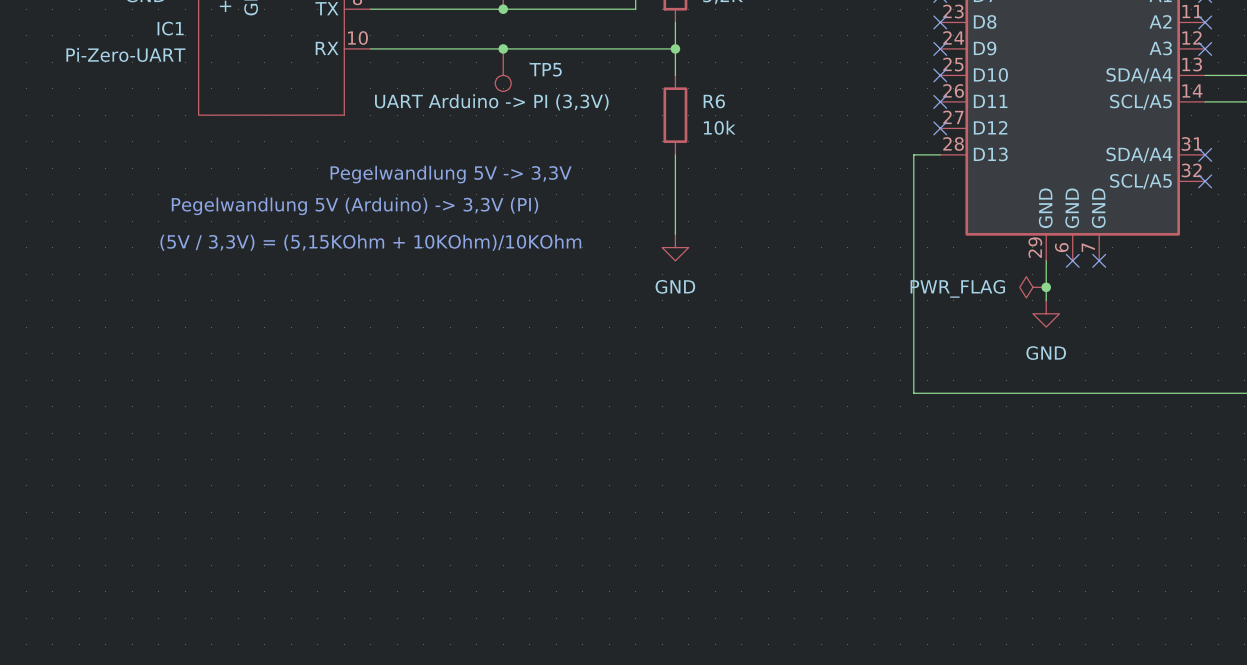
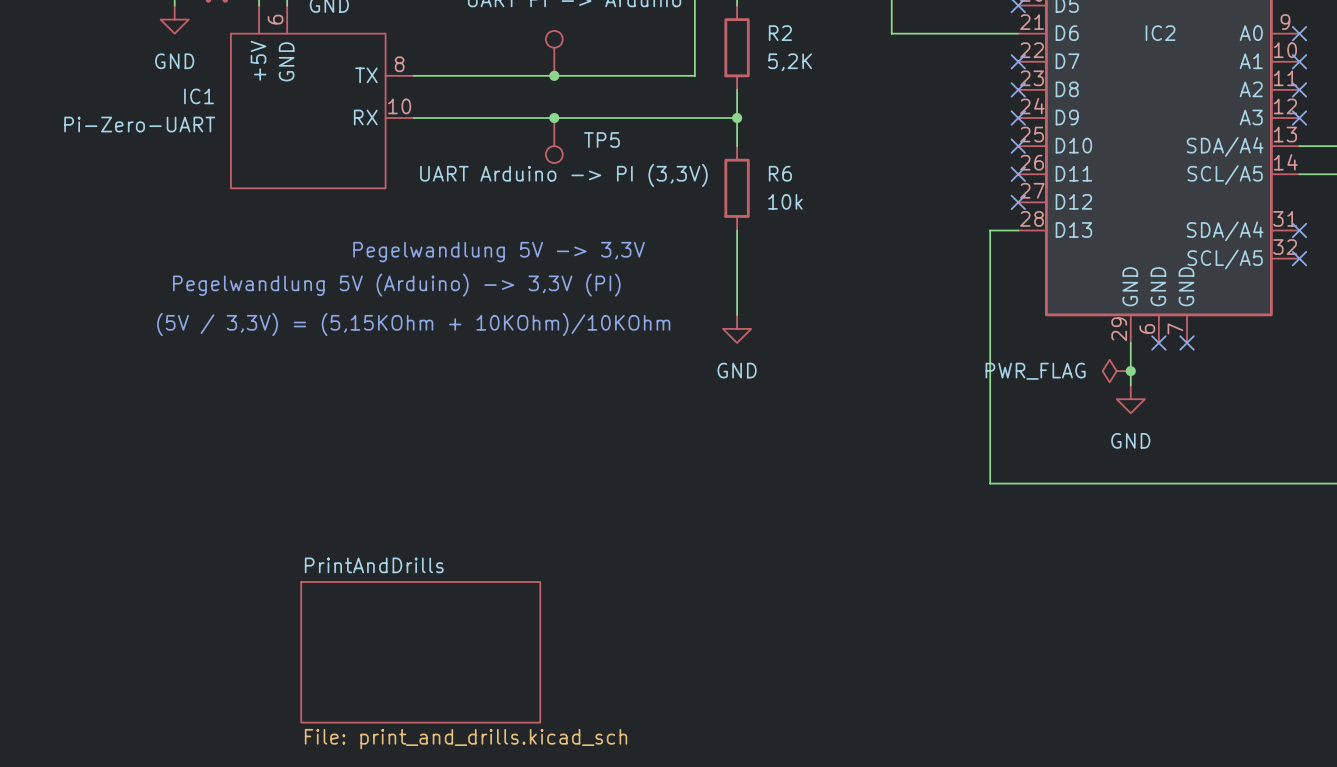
sheet PrintAndDrills: none -> File: print_and_drills.kicad_sch (420, 652)

